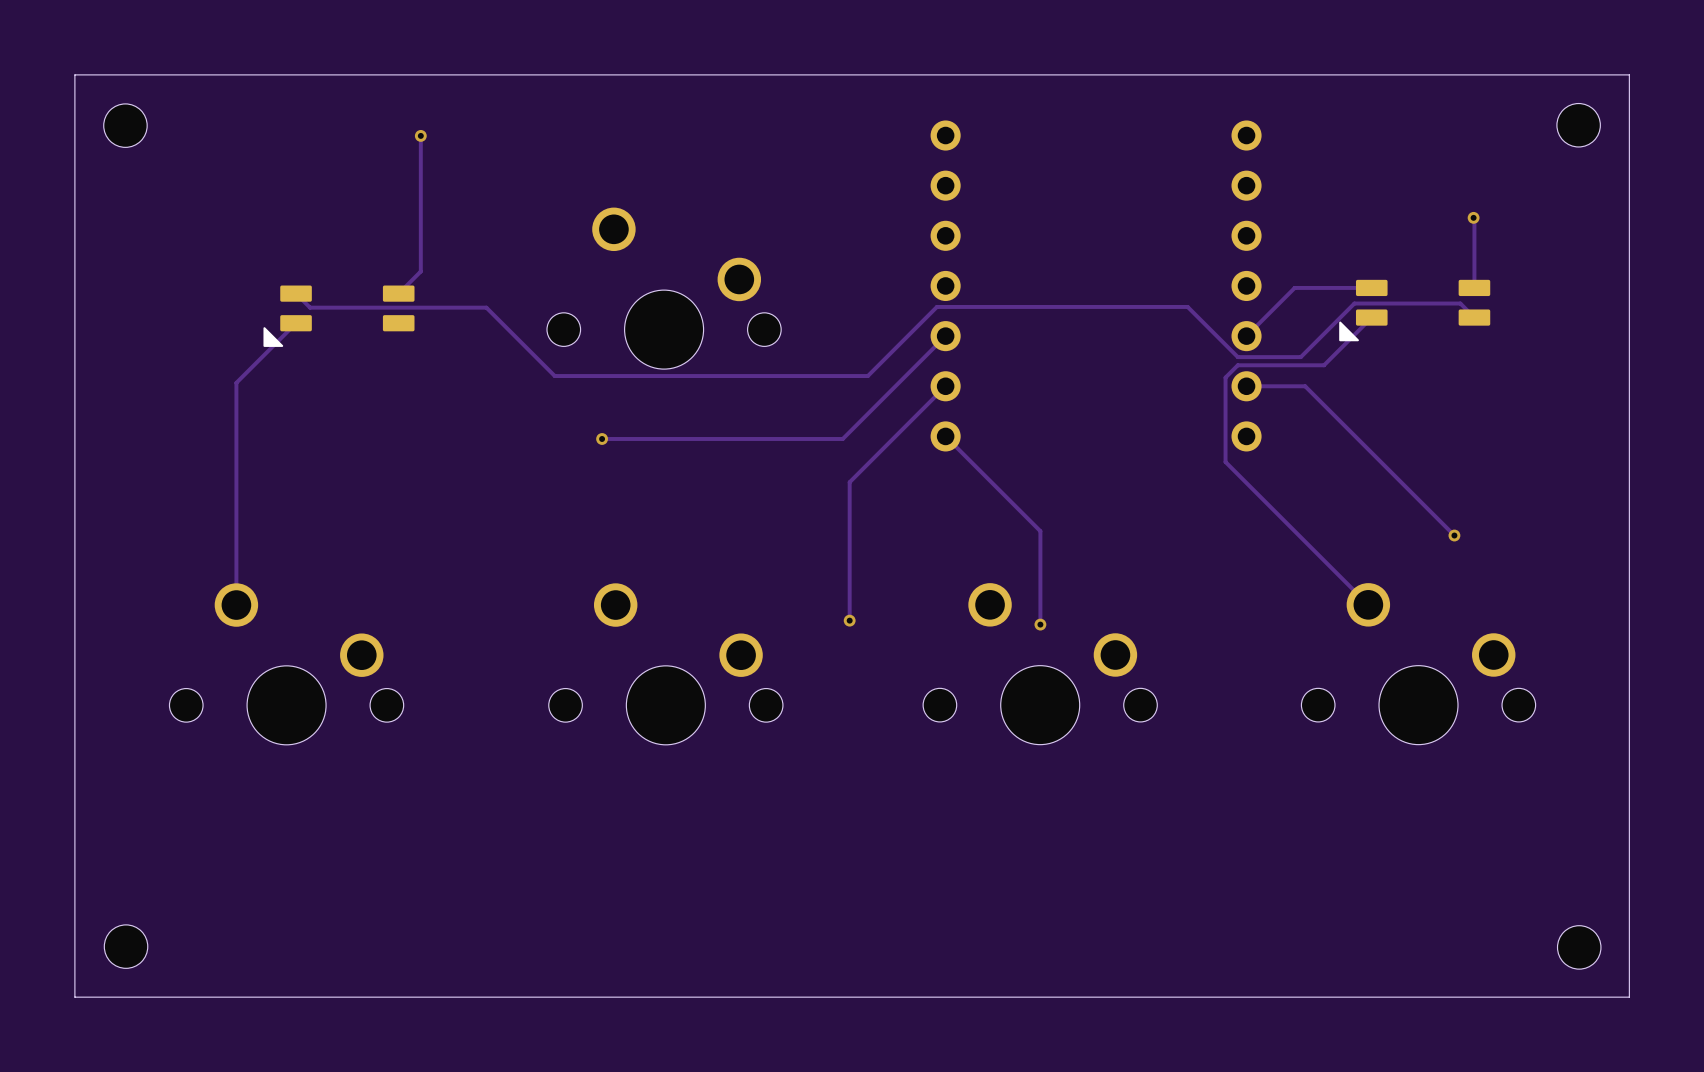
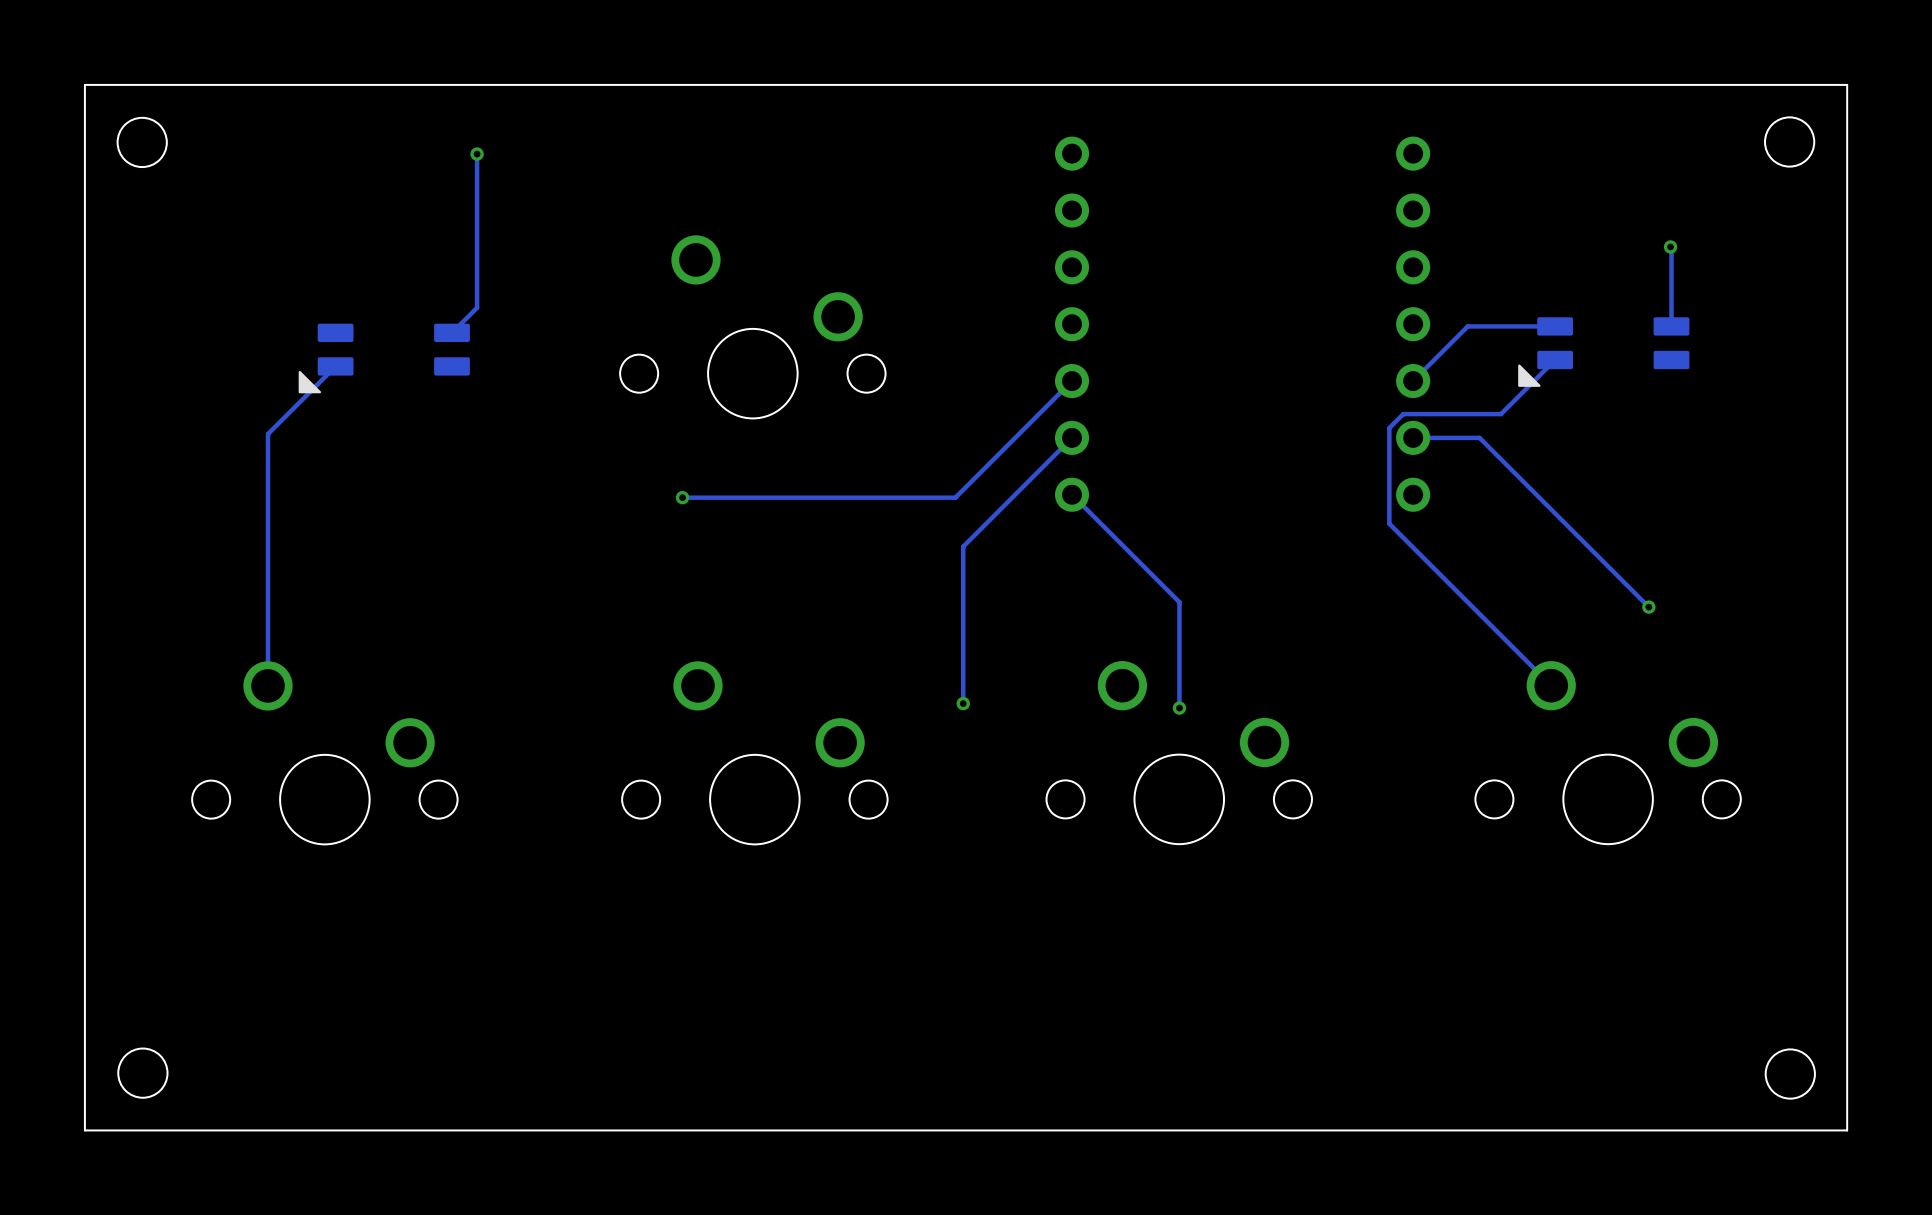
track: (296, 293) (310, 307) (486, 307) (554, 376) (867, 376) (936, 306) (1187, 306) (1237, 357) (1300, 357) (1354, 303) (1460, 303) (1474, 317) -> none

